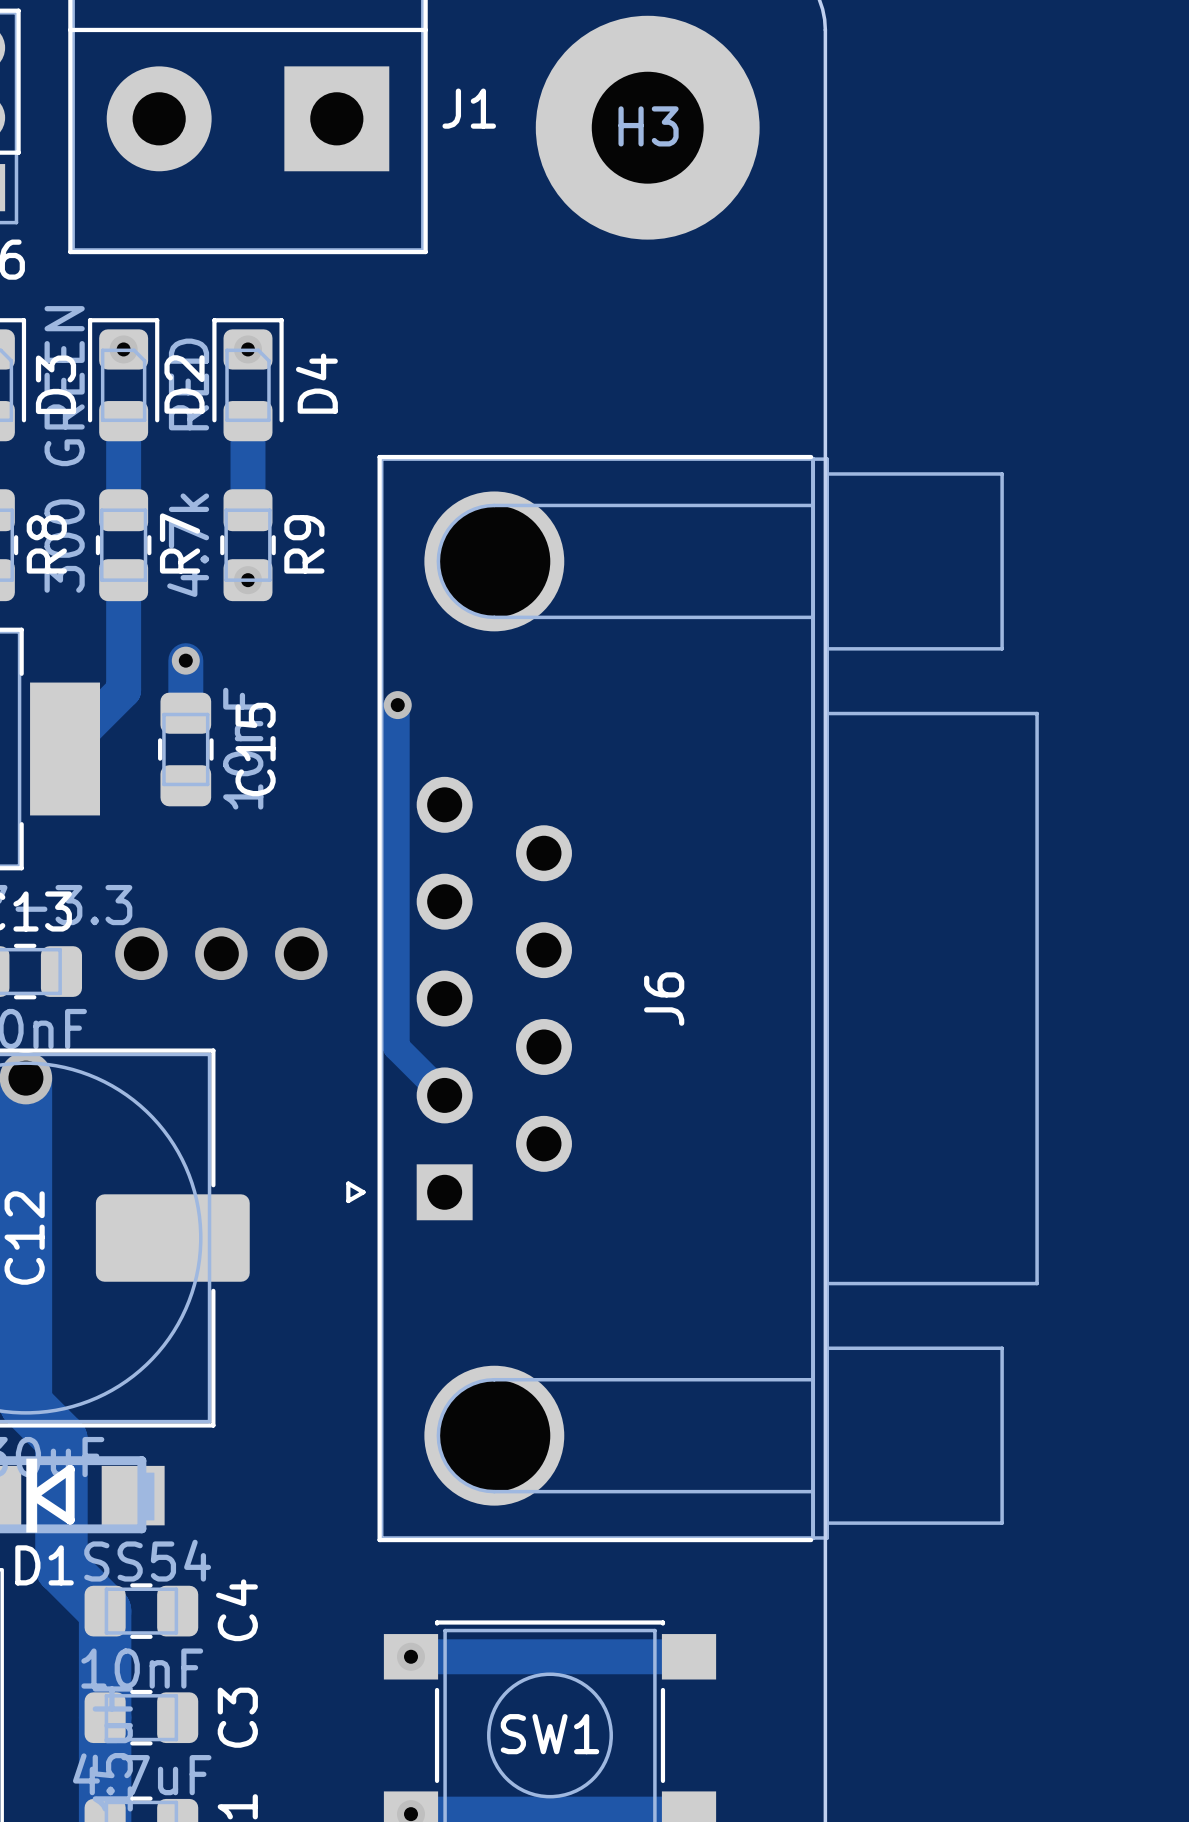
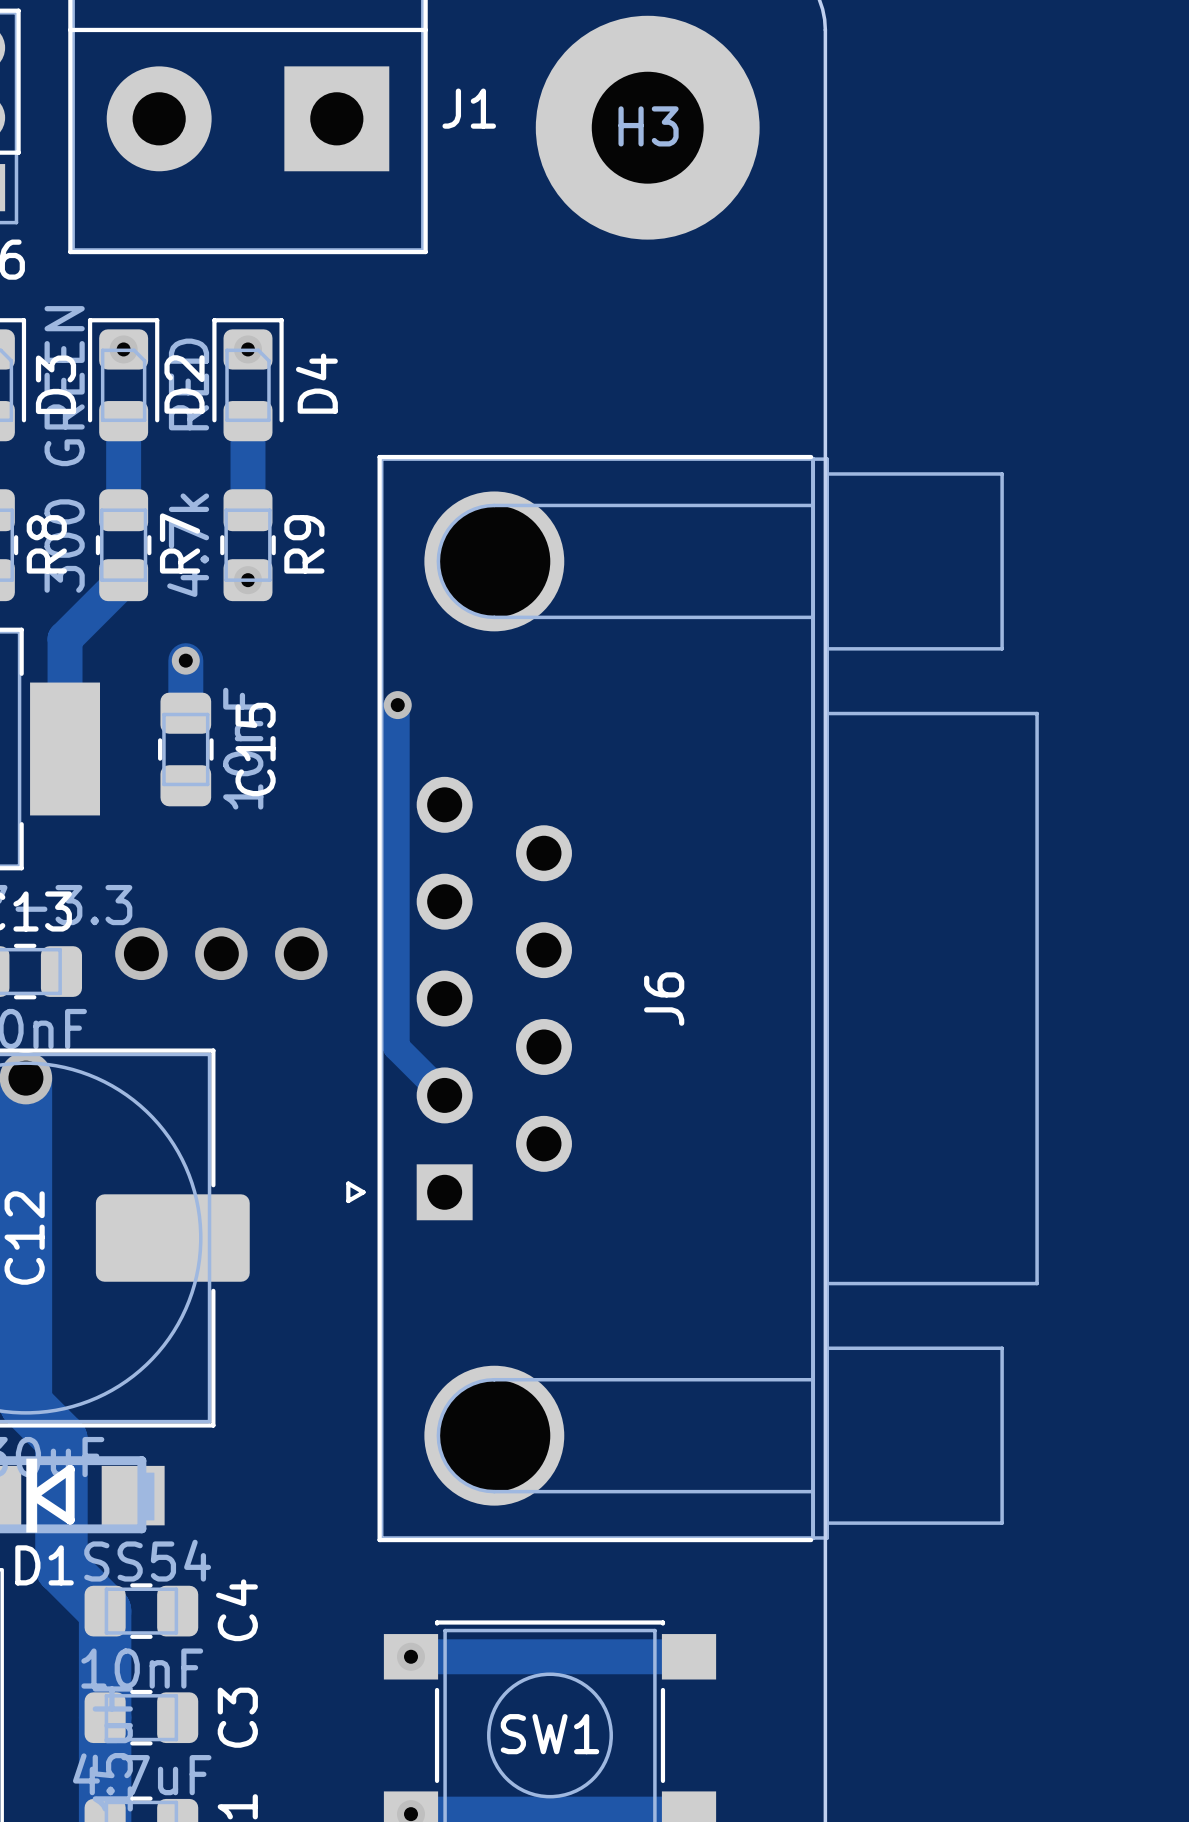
track: (123, 580) (123, 690) (65, 749) -> (123, 580) (65, 638) (65, 749)

